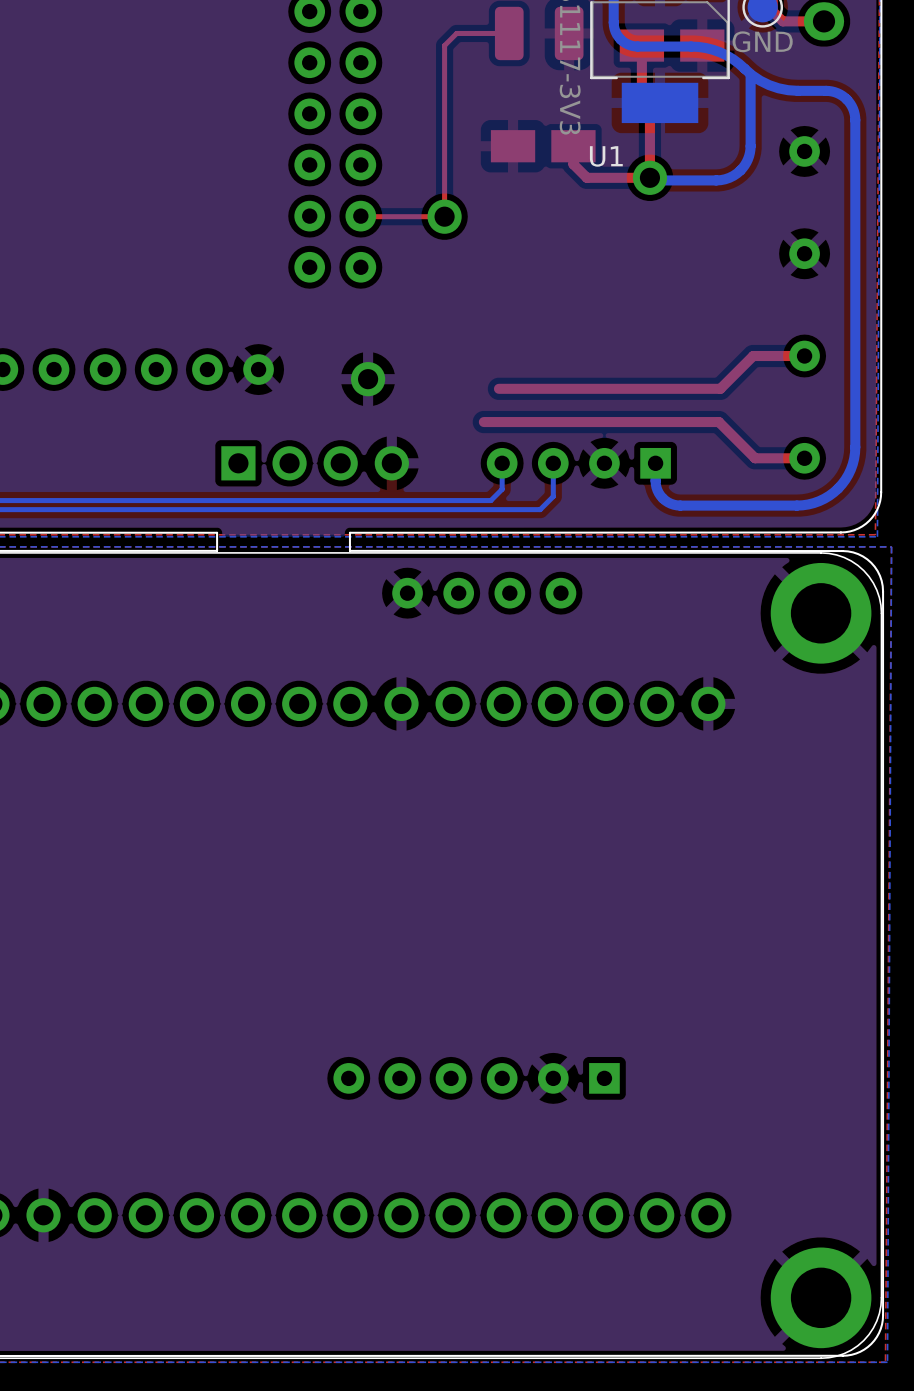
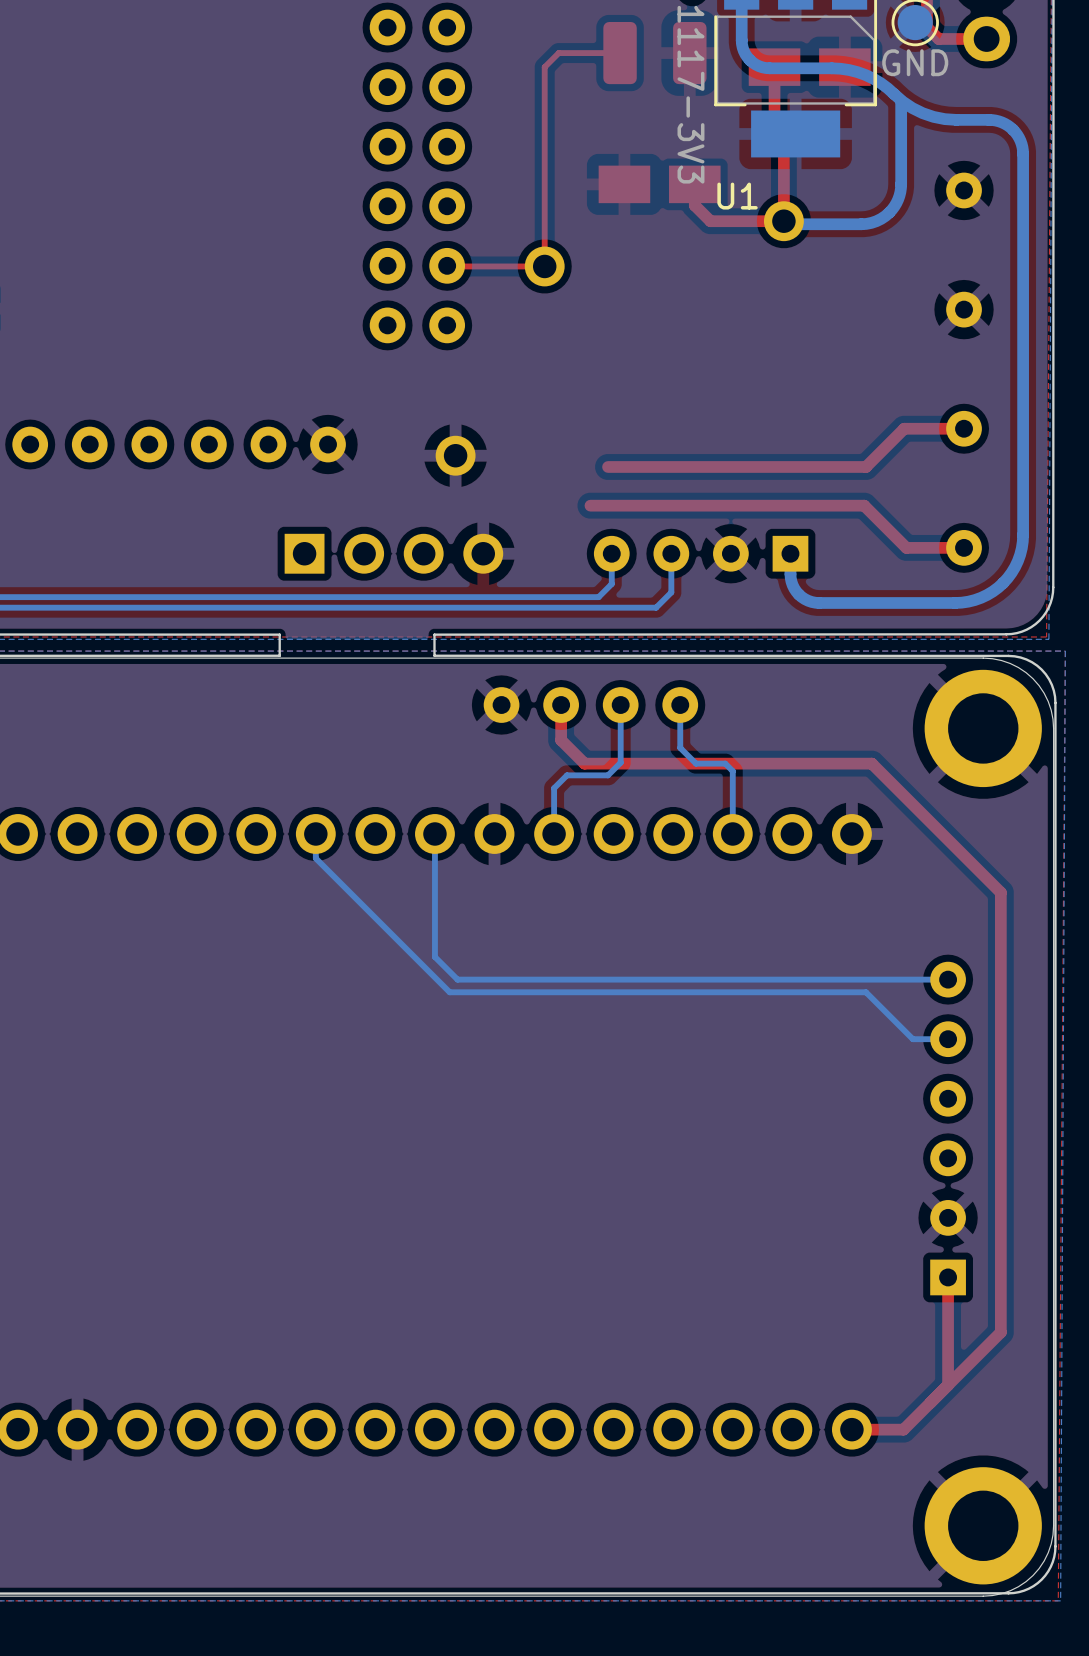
top track: none -> (561, 705) (561, 740) (584, 763) (871, 763) (1000, 892) (1000, 1332) (903, 1429) (851, 1429)
bottom track: none -> (620, 705) (620, 762) (608, 775) (566, 775) (554, 788) (554, 833)
bottom track: none -> (680, 705) (680, 747) (695, 763) (725, 763) (732, 771) (732, 833)
bottom track: none -> (315, 833) (315, 858) (449, 992) (865, 992) (912, 1039) (948, 1039)
bottom track: none -> (434, 833) (434, 956) (457, 979) (948, 979)
part rotation: 0° (476, 1078) -> 90° clockwise (948, 1128)
part position: (476, 1078) -> (948, 1128)
top track: none -> (948, 1277) (948, 1385)

